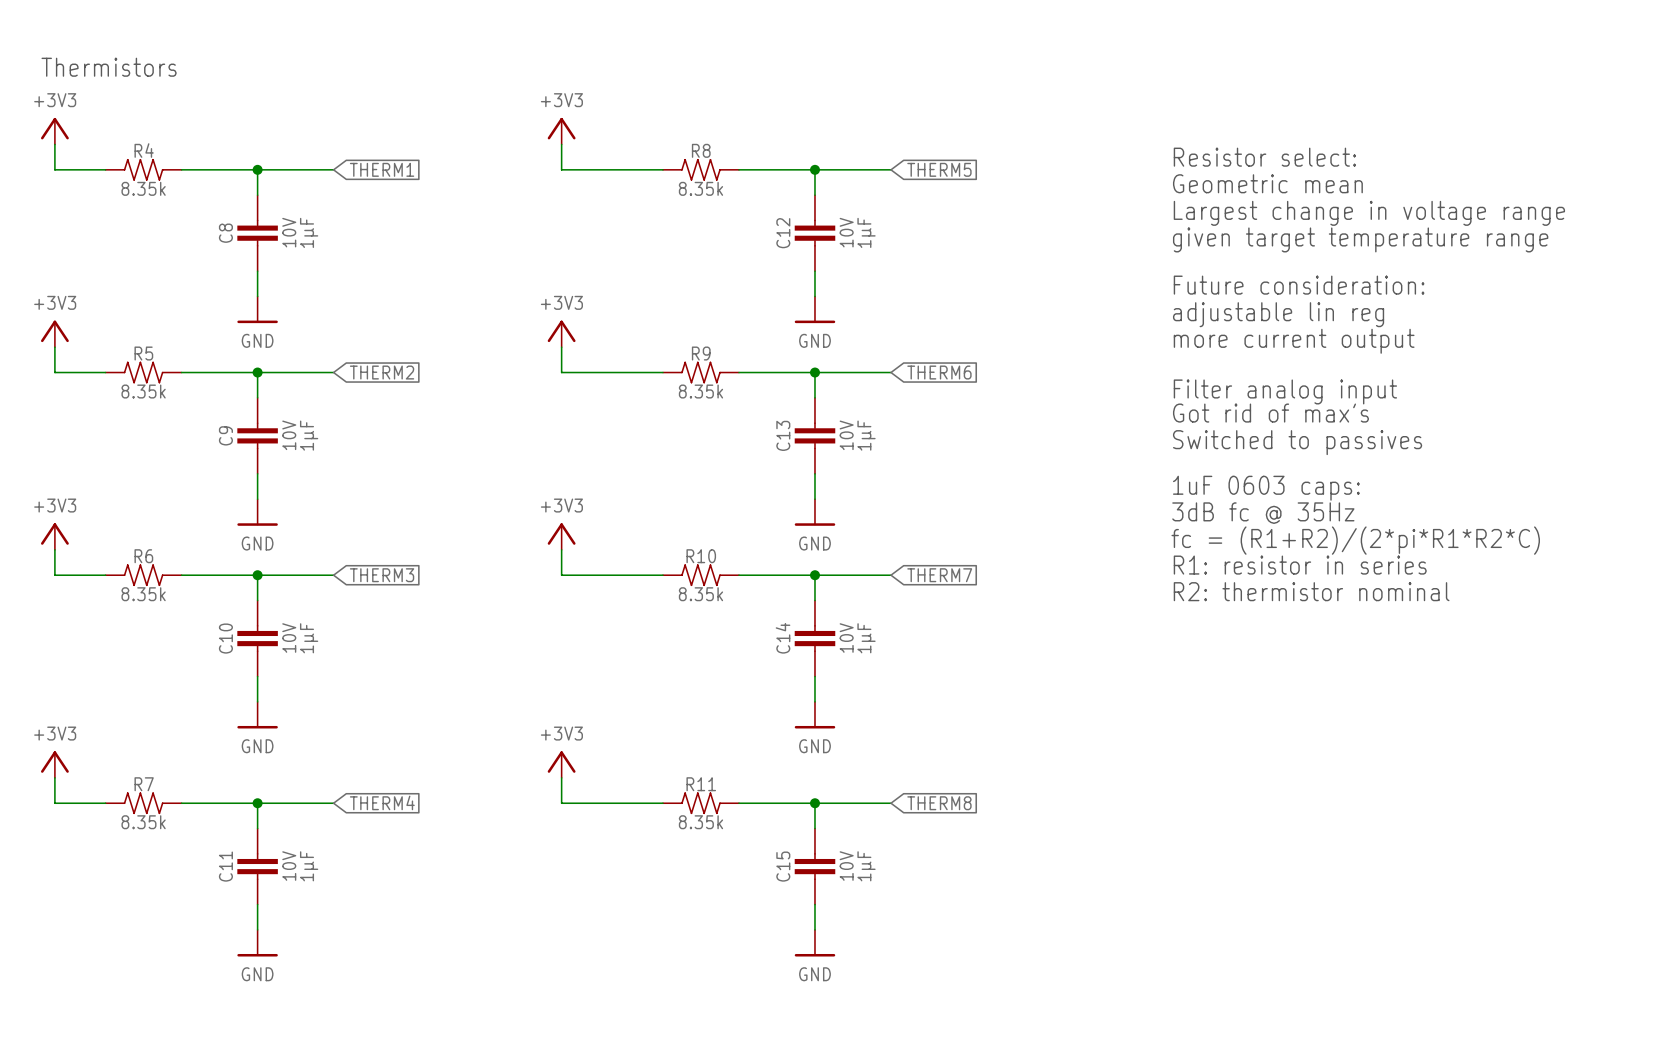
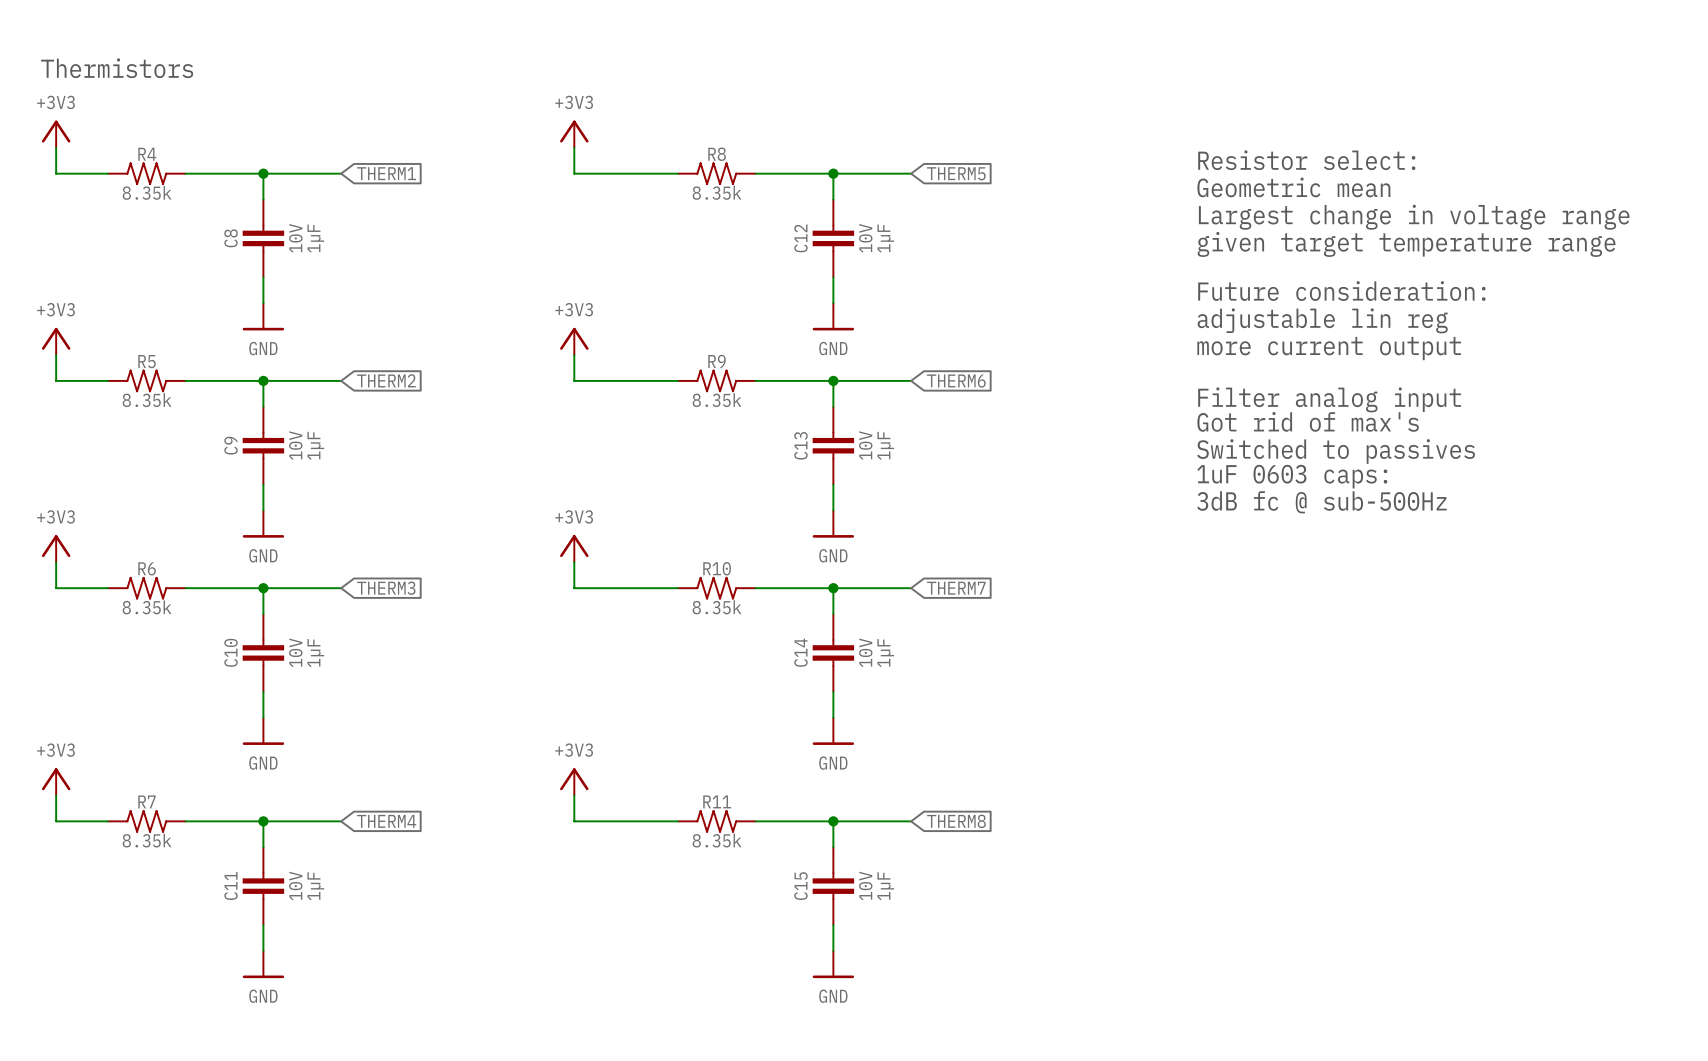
text: none -> 1uF 0603 caps: (1292, 476)
text: 1uF 0603 caps: (1266, 488) -> 3dB fc @ sub-500Hz (1321, 502)
text: 3dB fc @ 35Hz (1263, 513) -> none
text: fc = (R1+R2)/(2*pi*R1*R2*C) (1355, 540) -> none
text: R1: resistor in series (1300, 565) -> none
text: R2: thermistor nominal (1311, 591) -> none

